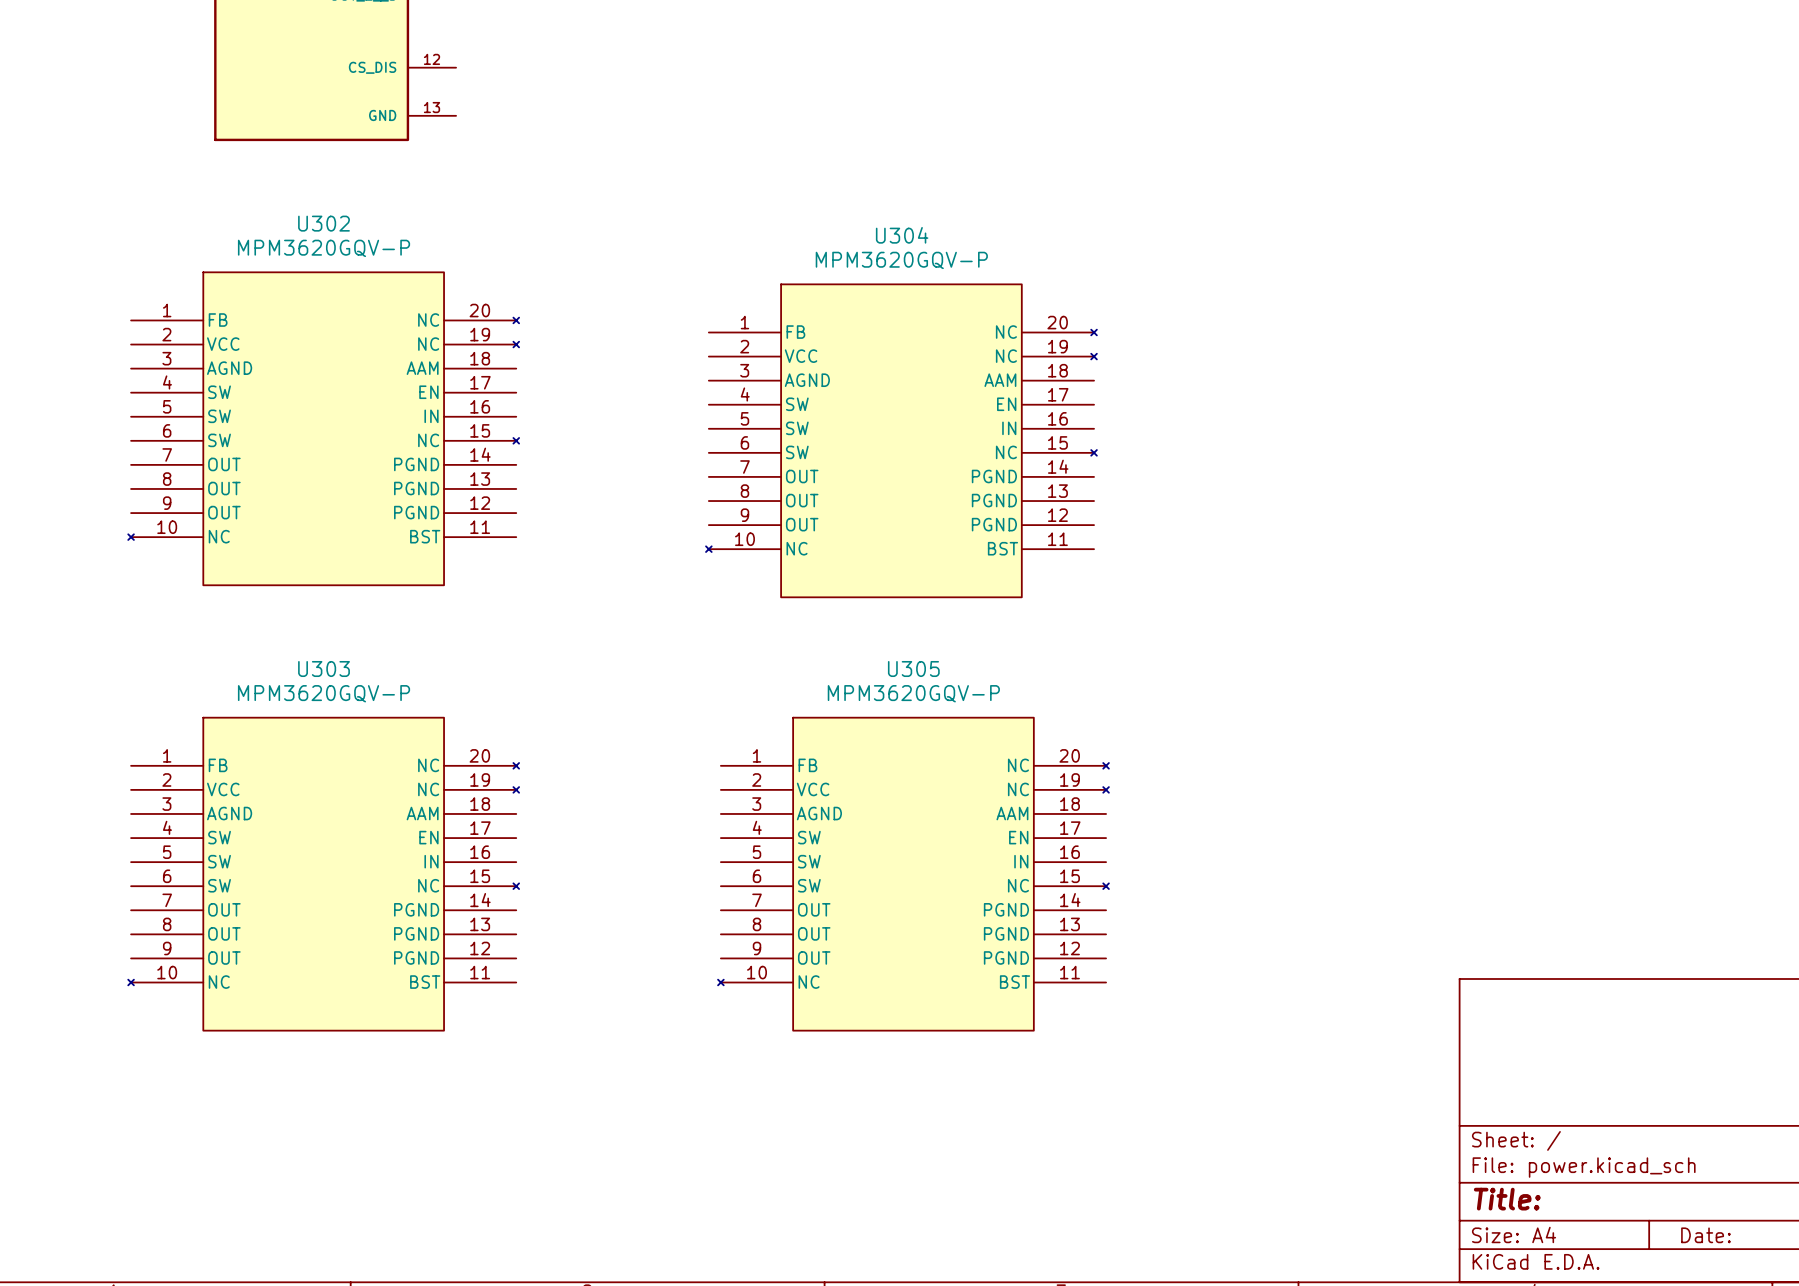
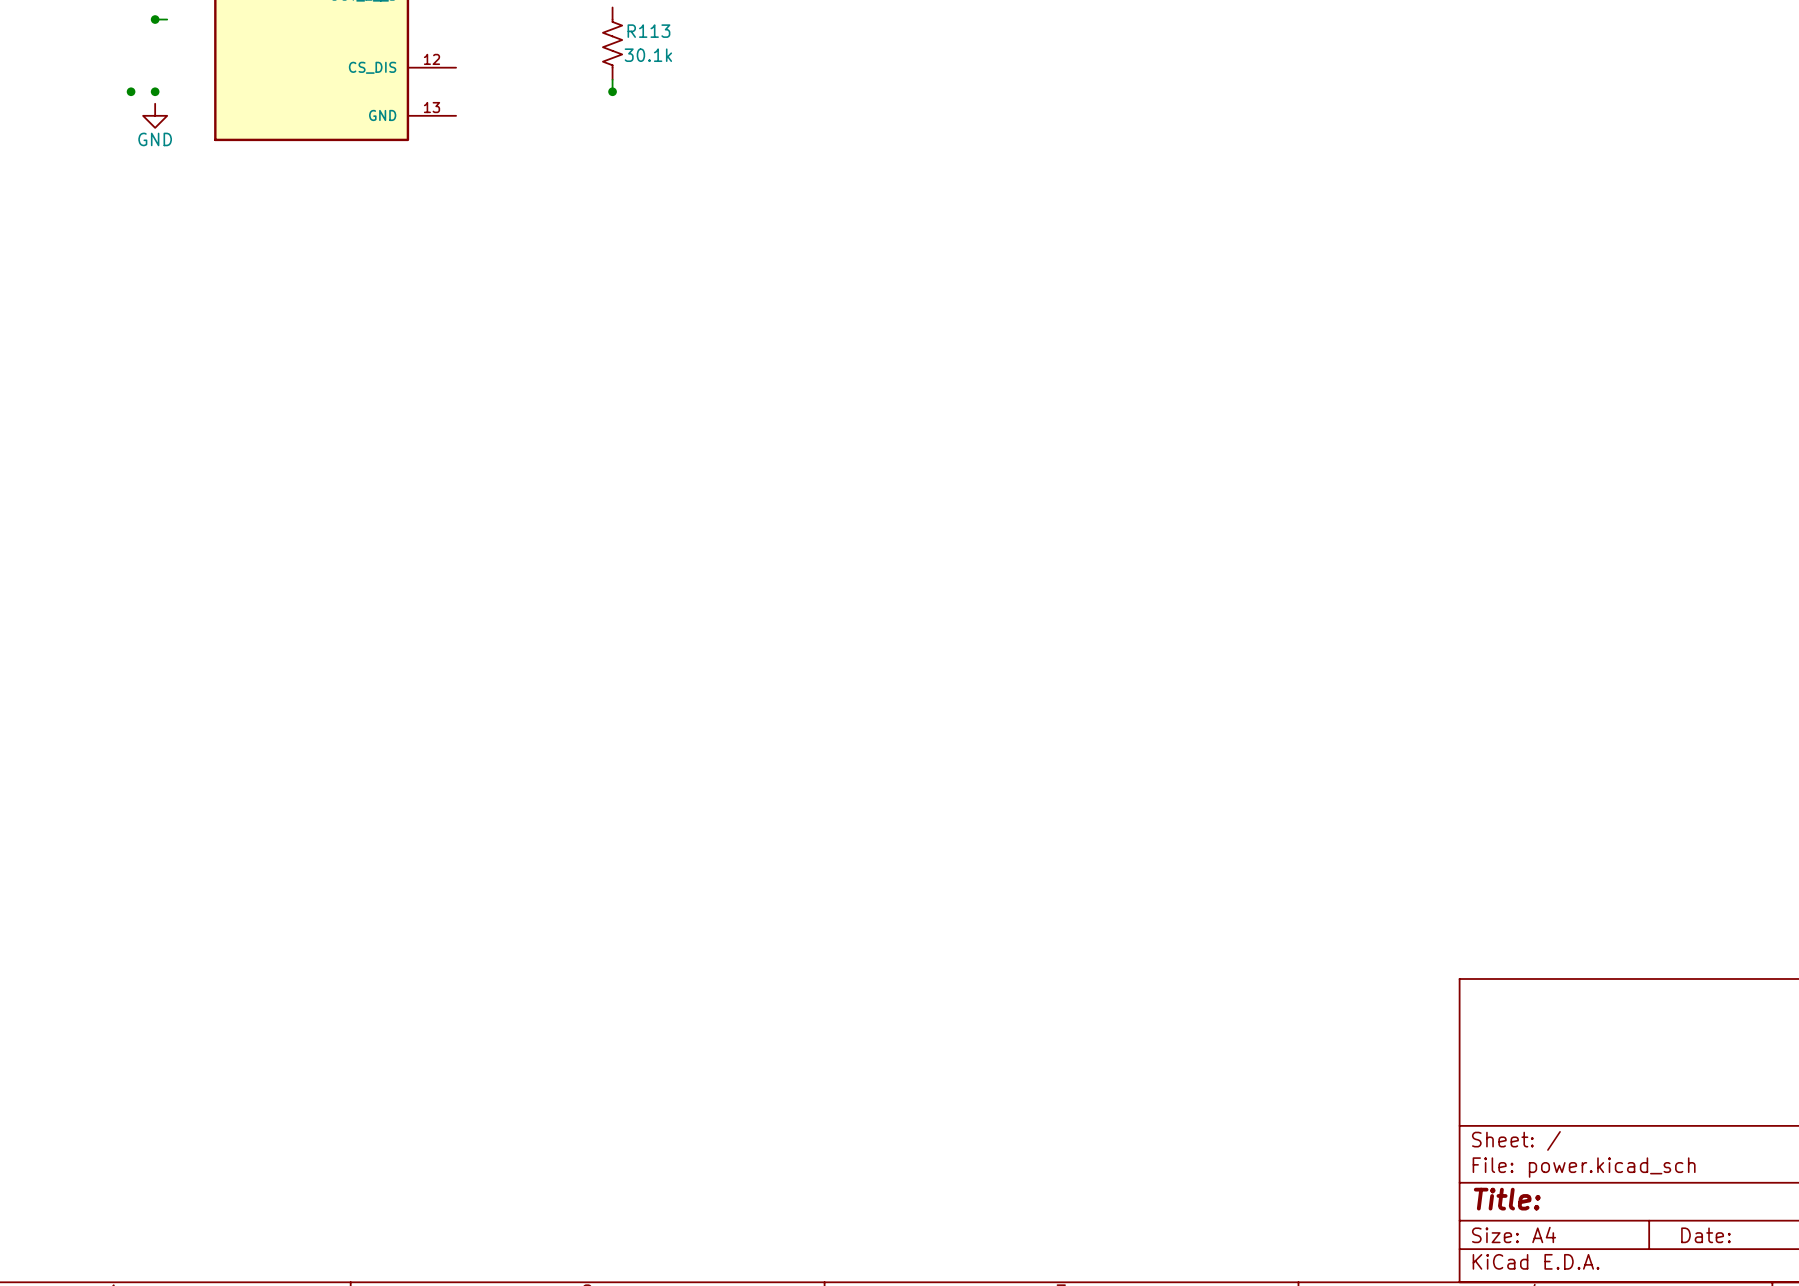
wire: none -> (155, 19) (167, 19)
junction: none -> (155, 19)
R113: none -> 30.1k (612, 43)
wire: none -> (612, 79) (612, 91)
junction: none -> (131, 91)
junction: none -> (155, 91)
junction: none -> (612, 91)
power symbol: none -> GND (155, 115)
U302: MPM3620GQV-P (323, 428) -> none
U304: MPM3620GQV-P (901, 440) -> none
U303: MPM3620GQV-P (323, 874) -> none
U305: MPM3620GQV-P (913, 874) -> none

